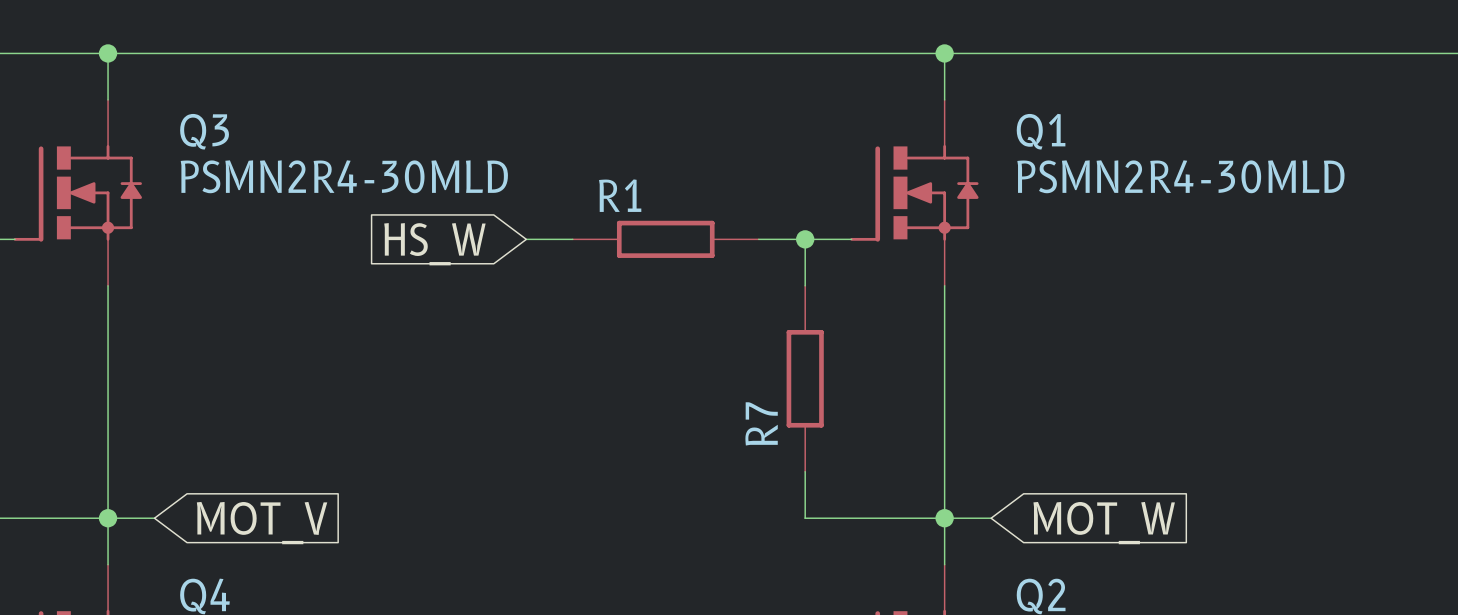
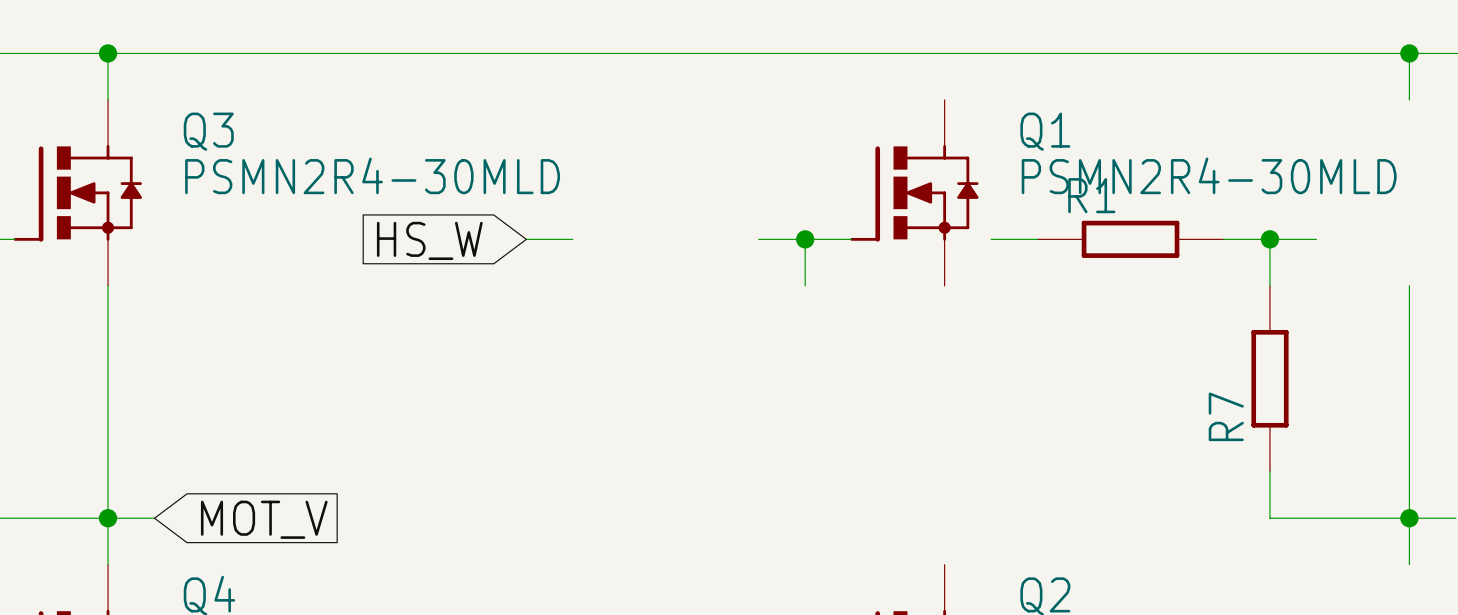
wire: (944, 53) (944, 99) -> (1269, 239) (1269, 285)
junction: (944, 53) -> none
wire: none -> (1409, 53) (1409, 99)
junction: none -> (1409, 53)
R1 position: (665, 239) -> (1130, 239)
wire: none -> (991, 239) (1037, 239)
wire: none -> (1223, 239) (1316, 239)
junction: none -> (1269, 239)
wire: (944, 285) (944, 564) -> none
wire: none -> (1409, 285) (1409, 564)
R7 position: (805, 378) -> (1269, 378)
wire: (805, 471) (805, 518) (991, 518) -> none
wire: none -> (1269, 471) (1269, 518) (1455, 518)
junction: (944, 518) -> none
junction: none -> (1409, 518)
global label: MOT_W (1104, 523) -> none

